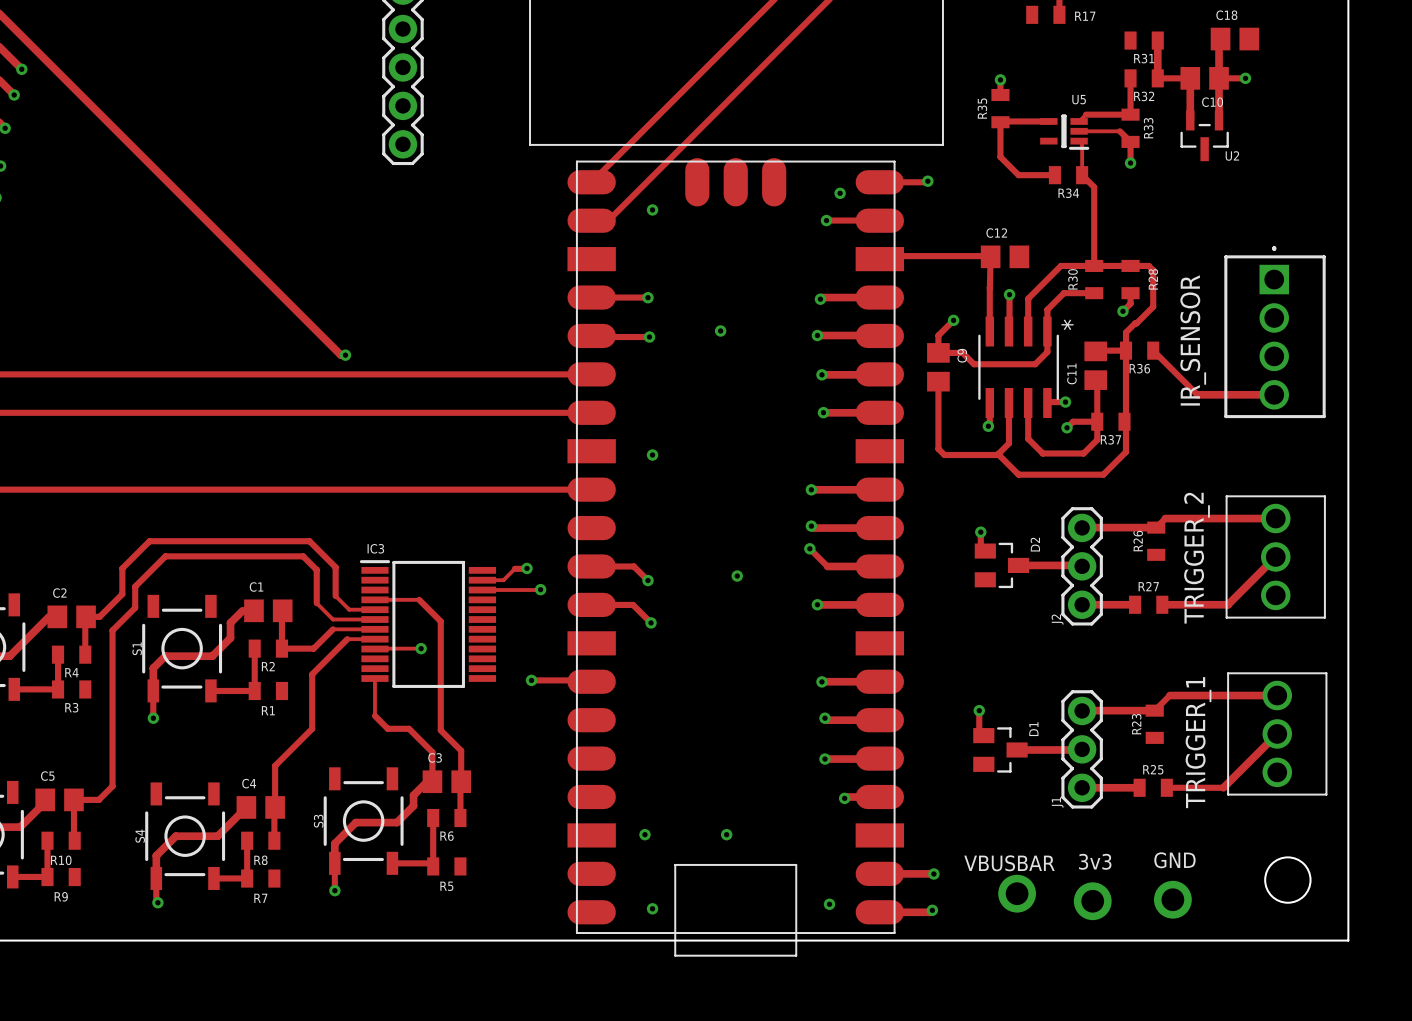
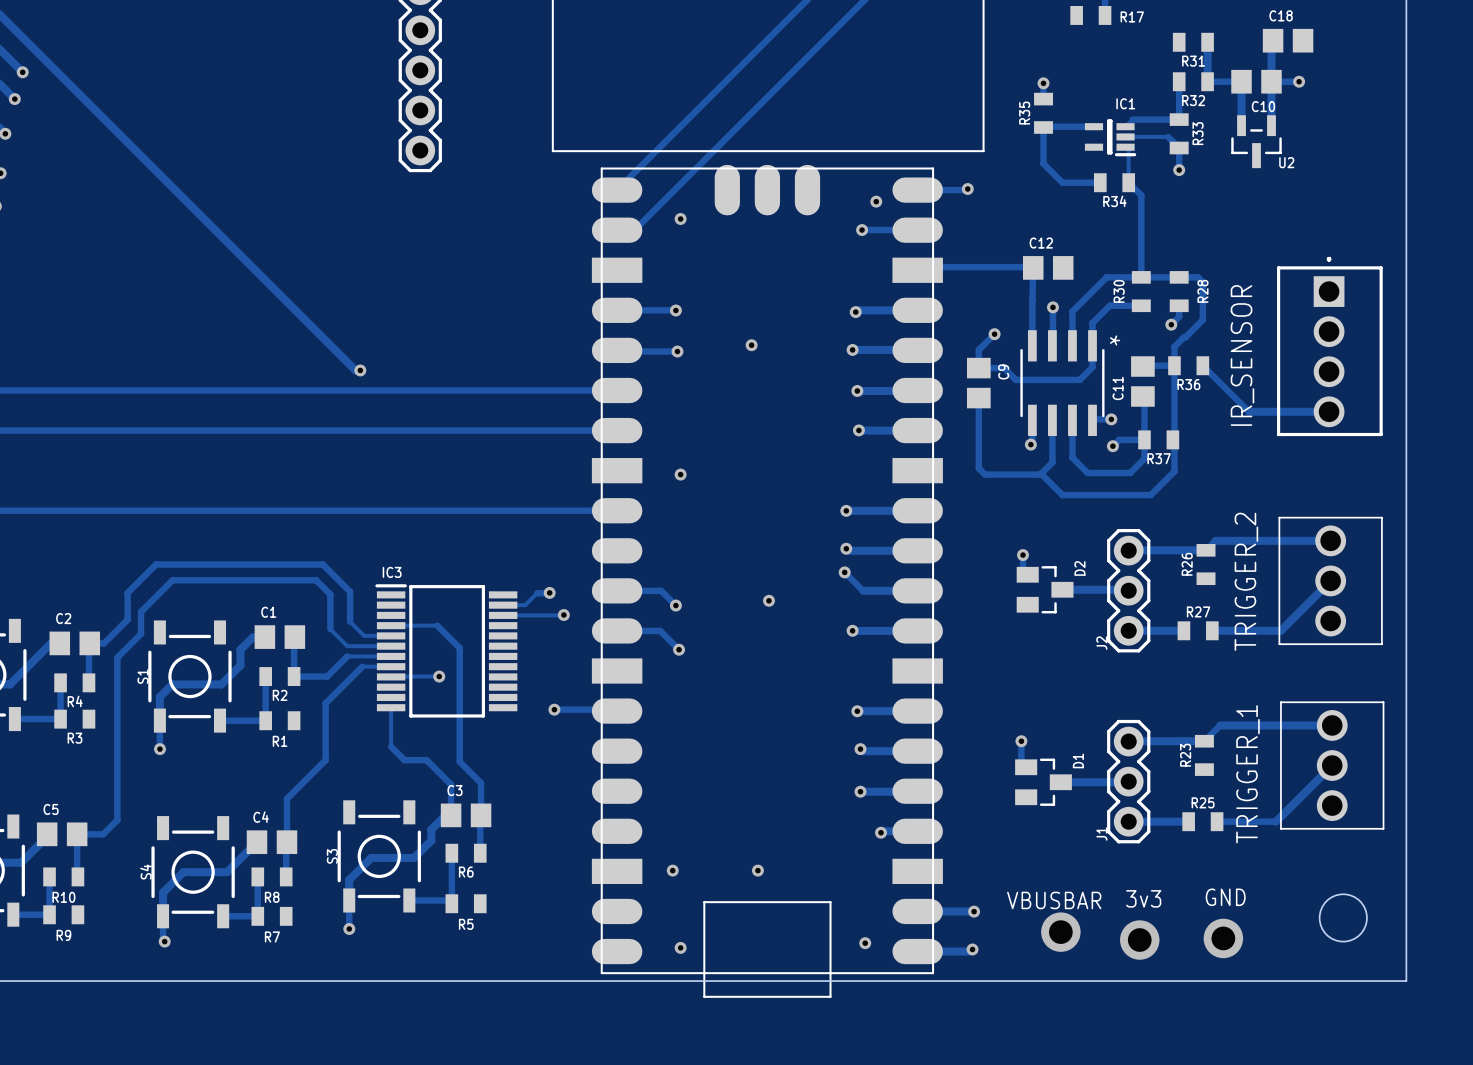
U5 name: U5 (1079, 99) -> IC1 (1125, 103)

